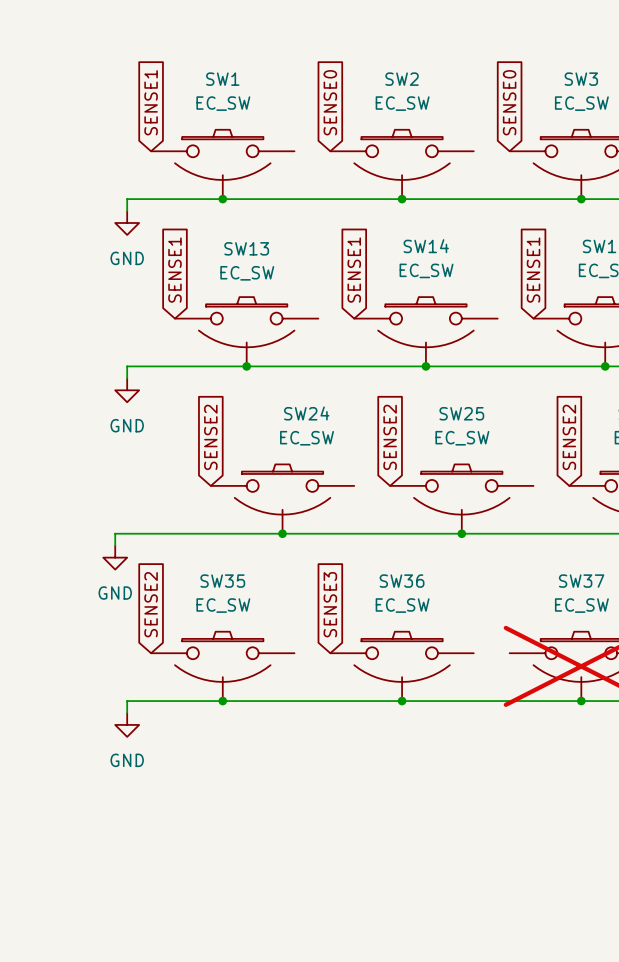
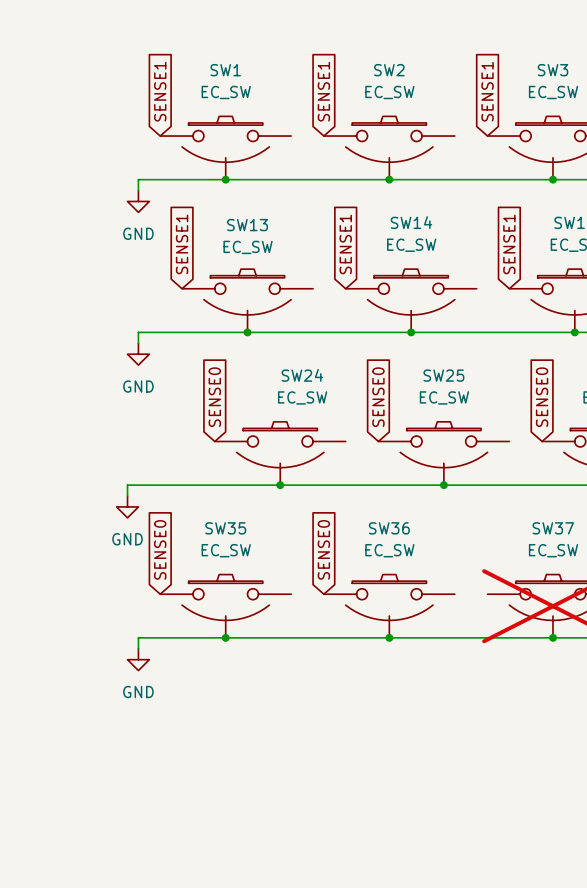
global label: SENSE0 (330, 102) -> SENSE1 (323, 91)
global label: SENSE0 (509, 102) -> SENSE1 (487, 91)
global label: SENSE2 (210, 437) -> SENSE0 (214, 397)
global label: SENSE2 (390, 437) -> SENSE0 (378, 397)
global label: SENSE2 (569, 437) -> SENSE0 (542, 397)
global label: SENSE2 (151, 604) -> SENSE0 (160, 549)
global label: SENSE3 (330, 604) -> SENSE0 (323, 549)

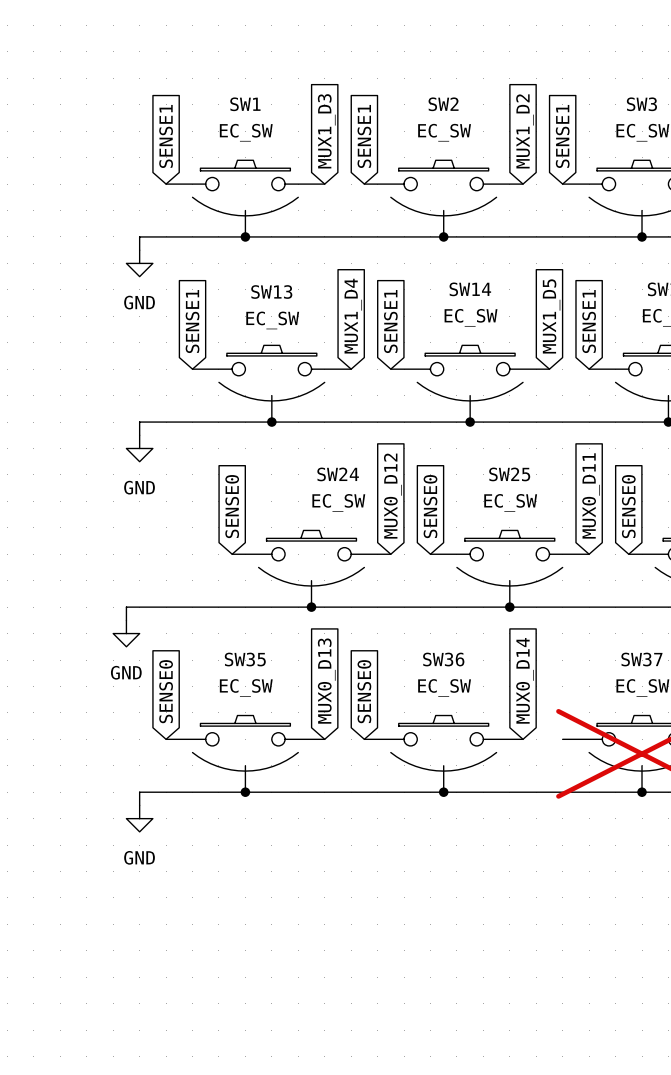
global label: none -> MUX1_D3 (326, 131)
global label: none -> MUX1_D2 (525, 131)
global label: none -> MUX1_D4 (353, 316)
global label: none -> MUX1_D5 (551, 316)
global label: none -> MUX0_D12 (392, 496)
global label: none -> MUX0_D11 (591, 495)
global label: none -> MUX0_D13 (326, 681)
global label: none -> MUX0_D14 (525, 680)

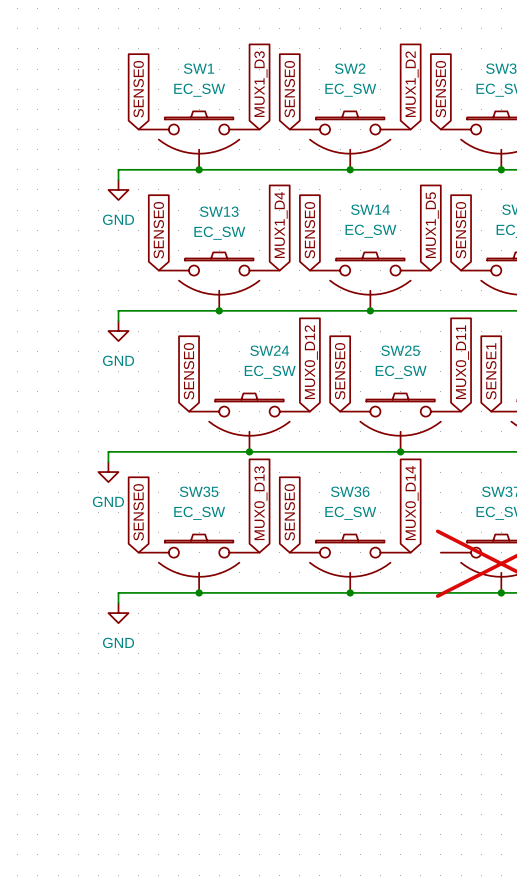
global label: SENSE1 (166, 136) -> SENSE0 (138, 89)
global label: SENSE1 (364, 136) -> SENSE0 (289, 89)
global label: SENSE1 (562, 136) -> SENSE0 (440, 89)
global label: SENSE1 (192, 321) -> SENSE0 (158, 230)
global label: SENSE1 (390, 321) -> SENSE0 (309, 230)
global label: SENSE1 (589, 321) -> SENSE0 (461, 230)
global label: SENSE0 (628, 506) -> SENSE1 (491, 371)

